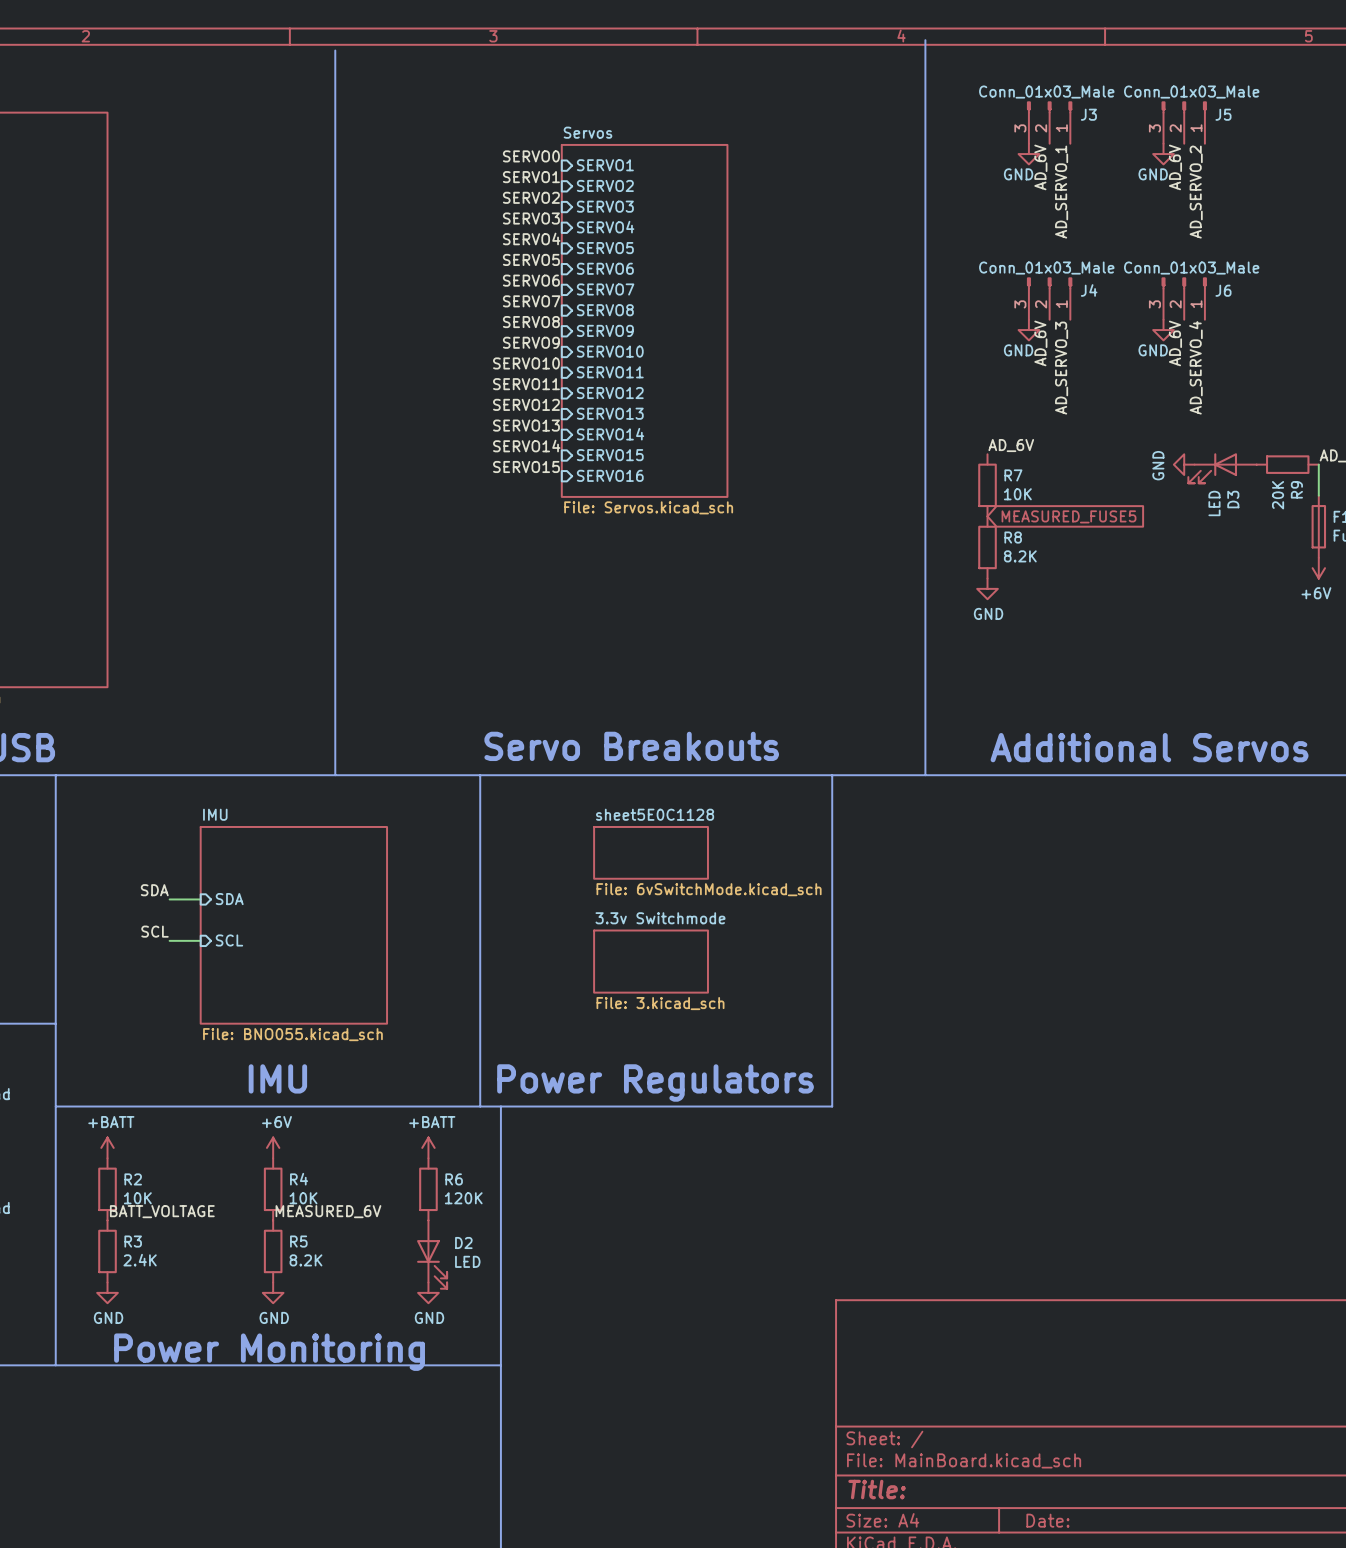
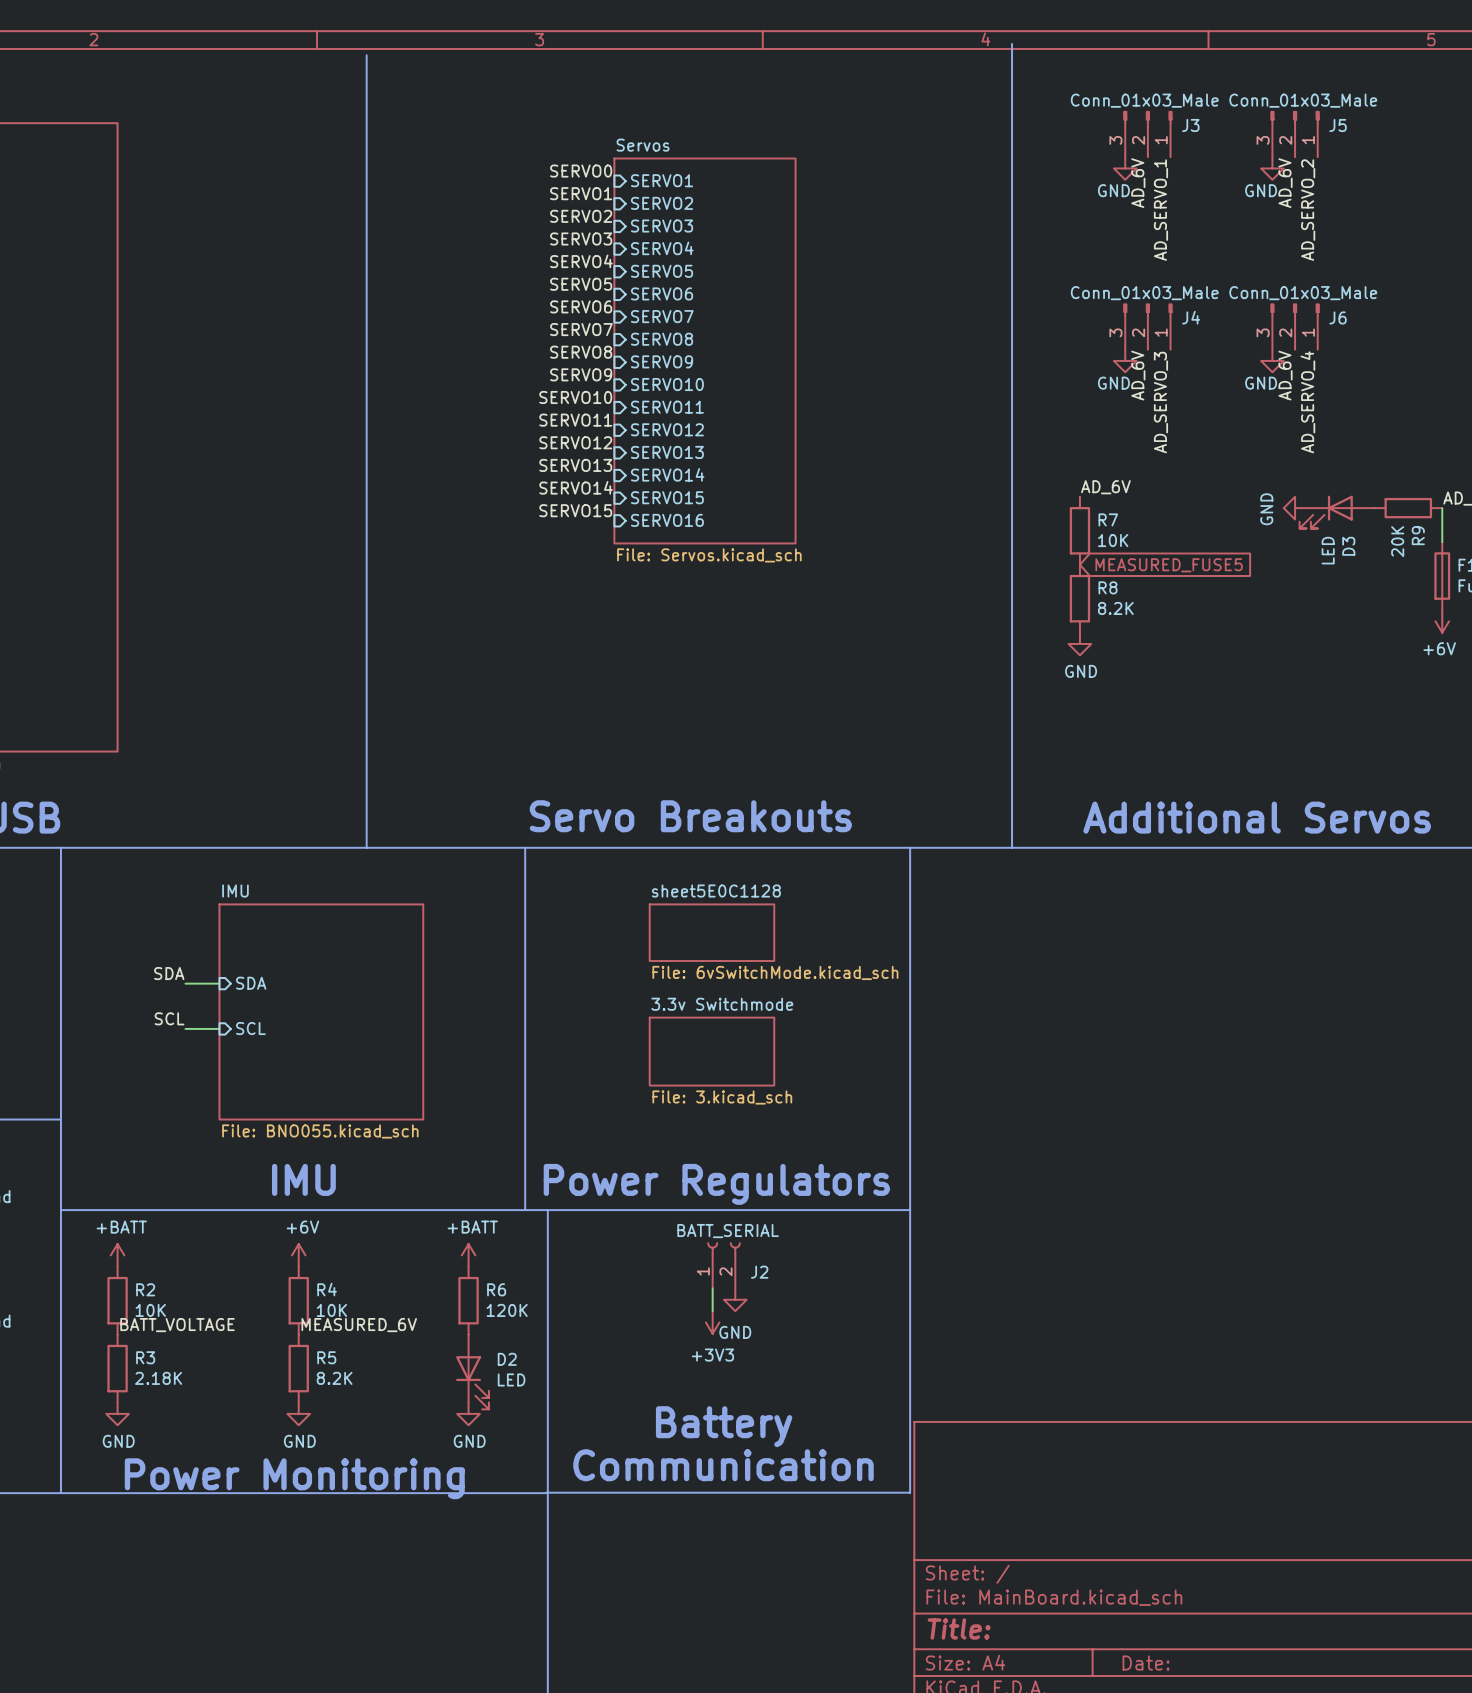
line: none -> (910, 1210) (910, 1492) (546, 1492)
J2: none -> BATT_SERIAL (723, 1265)
wire: none -> (712, 1288) (712, 1311)
power symbol: none -> GND (735, 1299)
power symbol: none -> +3V3 (712, 1322)
R3 value: 2.4K (140, 1260) -> 2.18K (158, 1378)
text: none -> Battery (724, 1426)
text: none -> Communication (723, 1465)

